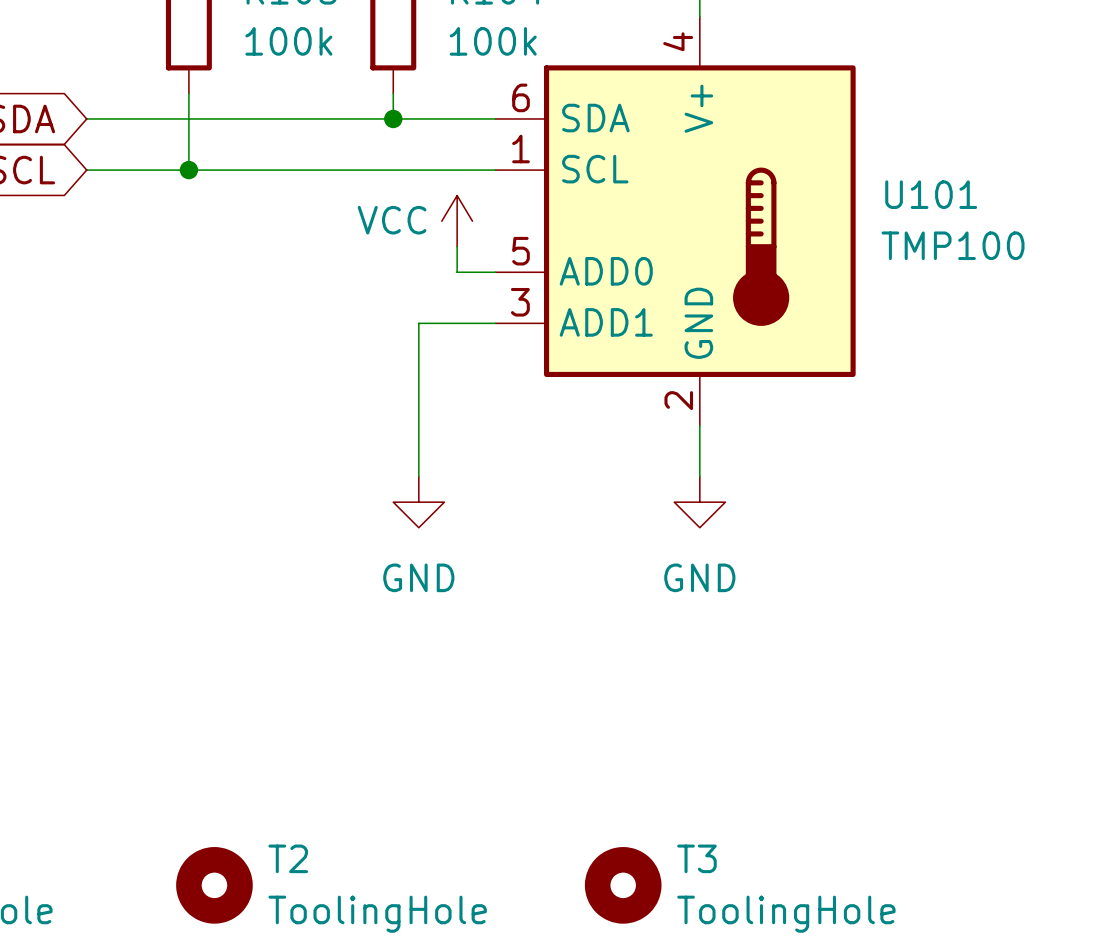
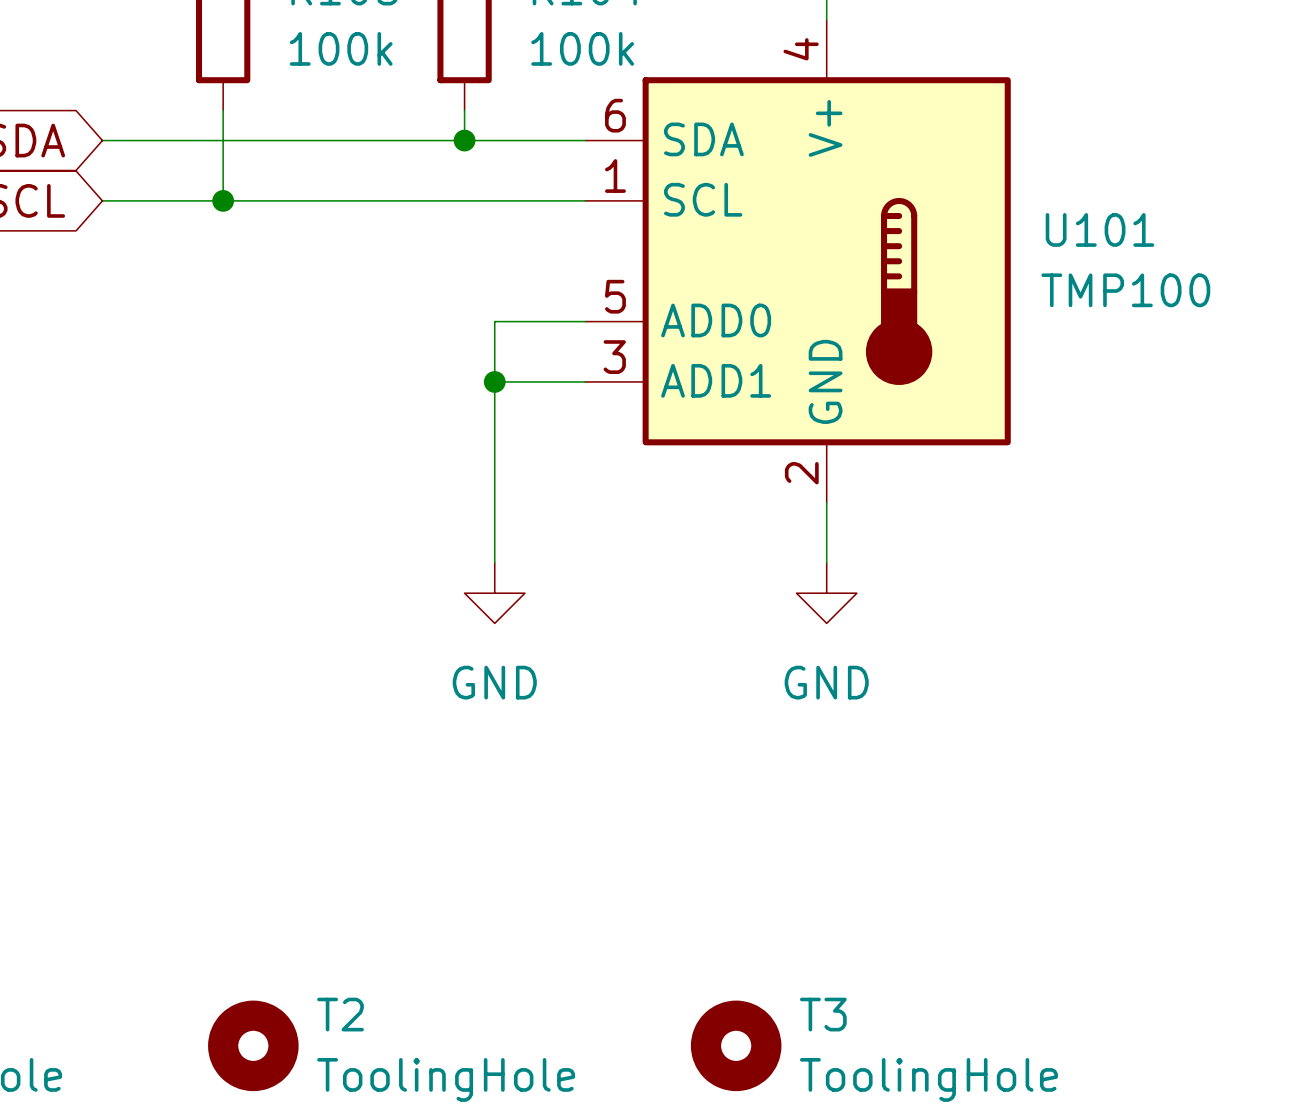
power symbol: VCC (457, 221) -> none
wire: (457, 246) (457, 272) -> (494, 381) (494, 321) (540, 321)
junction: none -> (494, 381)

